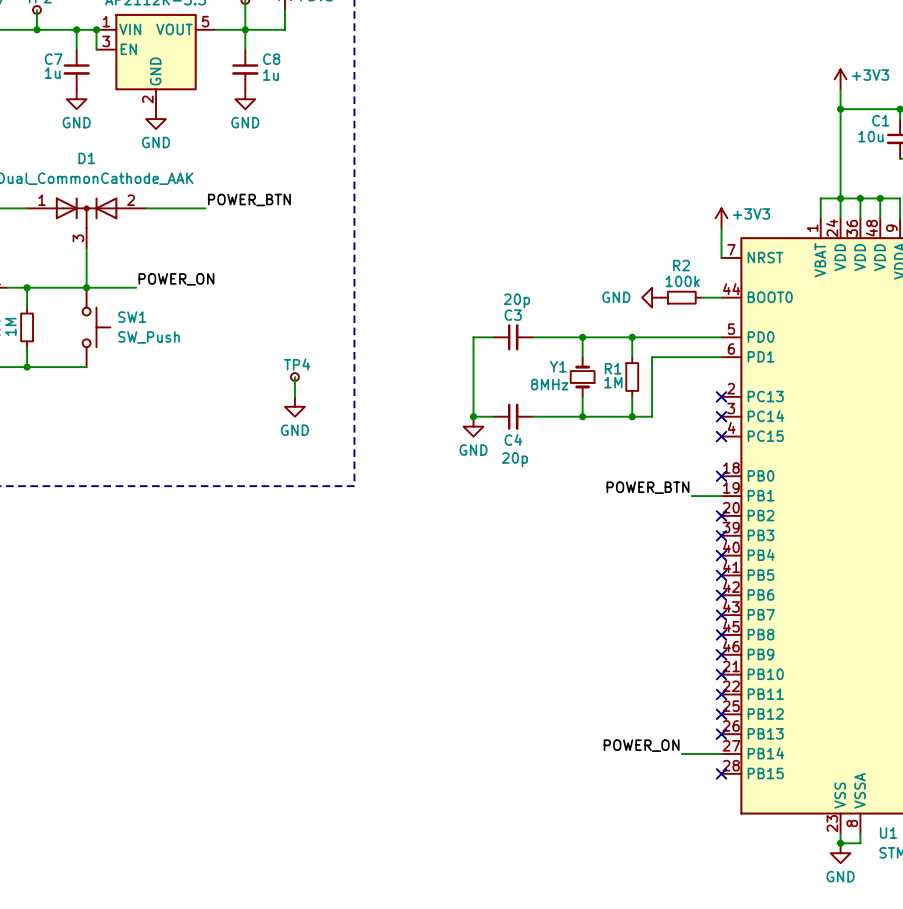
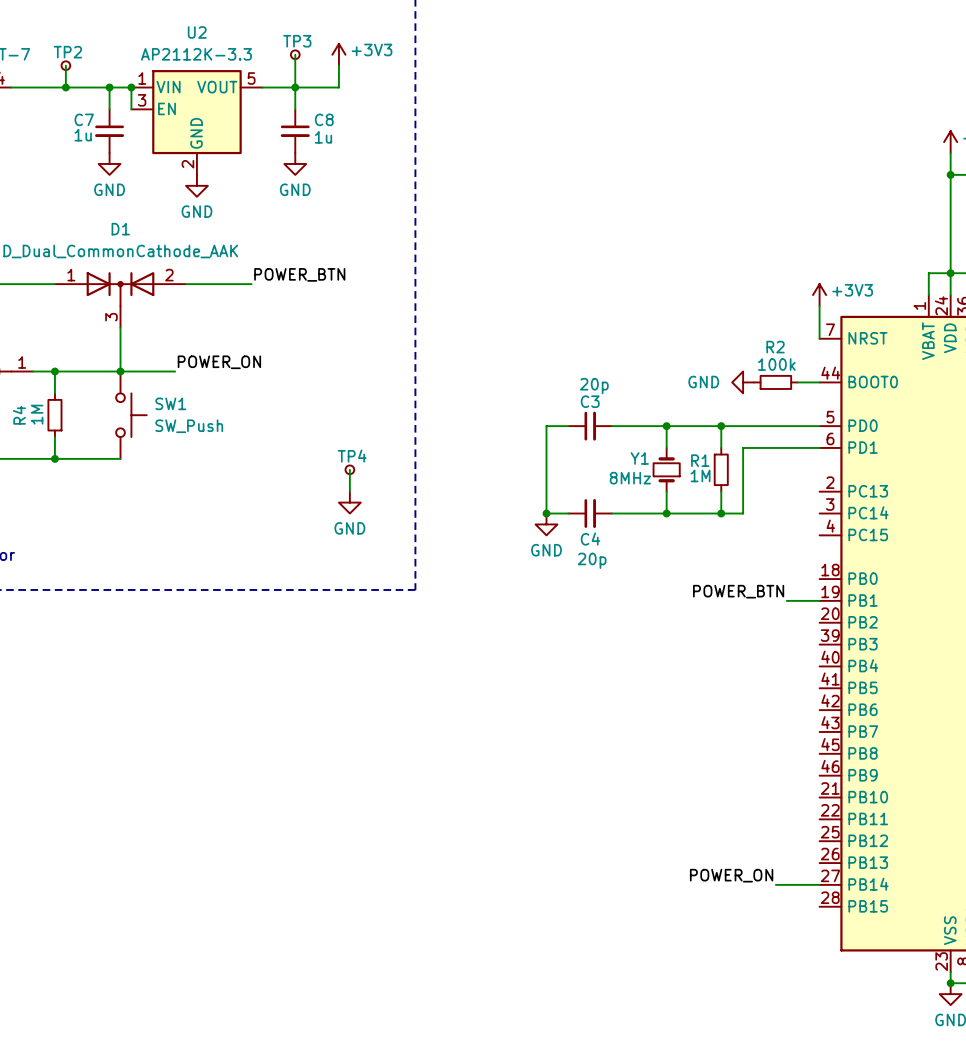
no-connect mark: (721, 396) -> none
no-connect mark: (721, 416) -> none
no-connect mark: (721, 436) -> none
no-connect mark: (721, 476) -> none
no-connect mark: (721, 515) -> none
no-connect mark: (721, 535) -> none
no-connect mark: (721, 555) -> none
no-connect mark: (721, 575) -> none
no-connect mark: (721, 595) -> none
no-connect mark: (721, 615) -> none
no-connect mark: (721, 634) -> none
no-connect mark: (721, 654) -> none
no-connect mark: (721, 674) -> none
no-connect mark: (721, 694) -> none
no-connect mark: (721, 714) -> none
no-connect mark: (721, 734) -> none
no-connect mark: (721, 773) -> none

